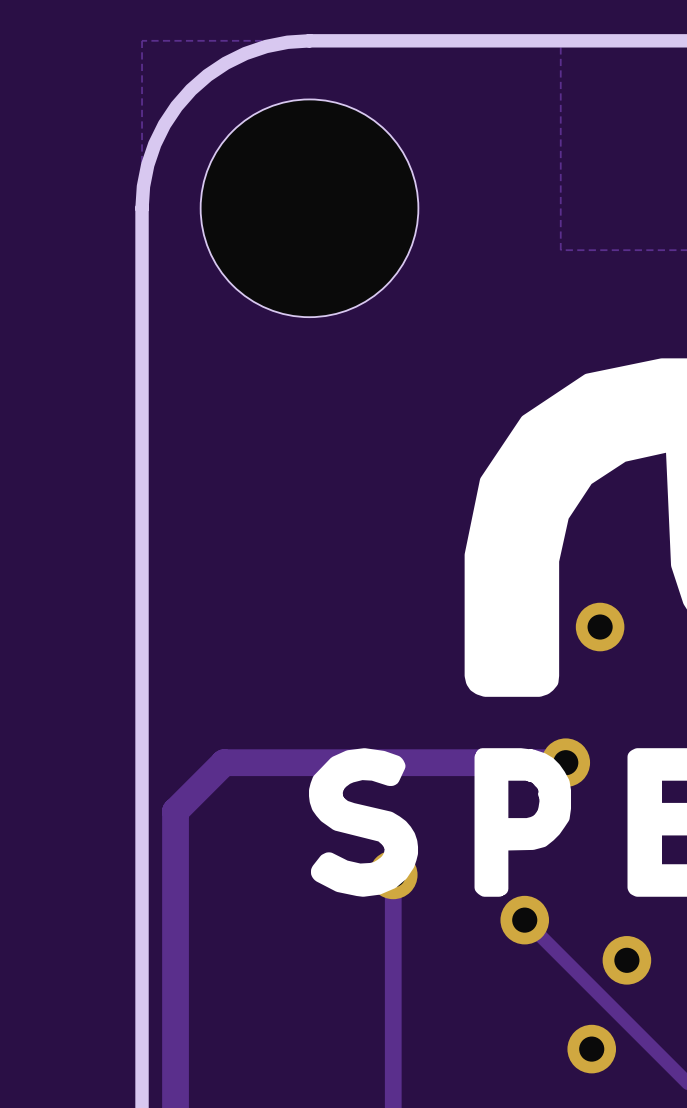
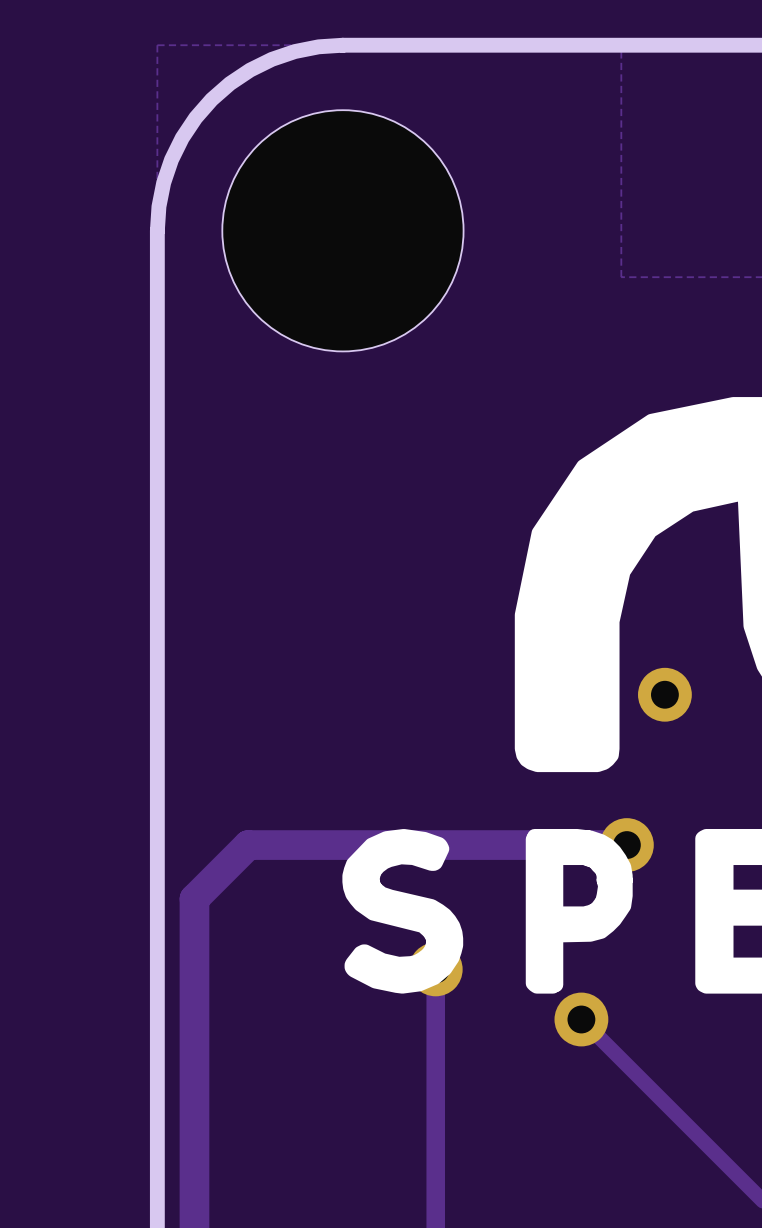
via: (626, 960) -> none
via: (591, 1049) -> none

